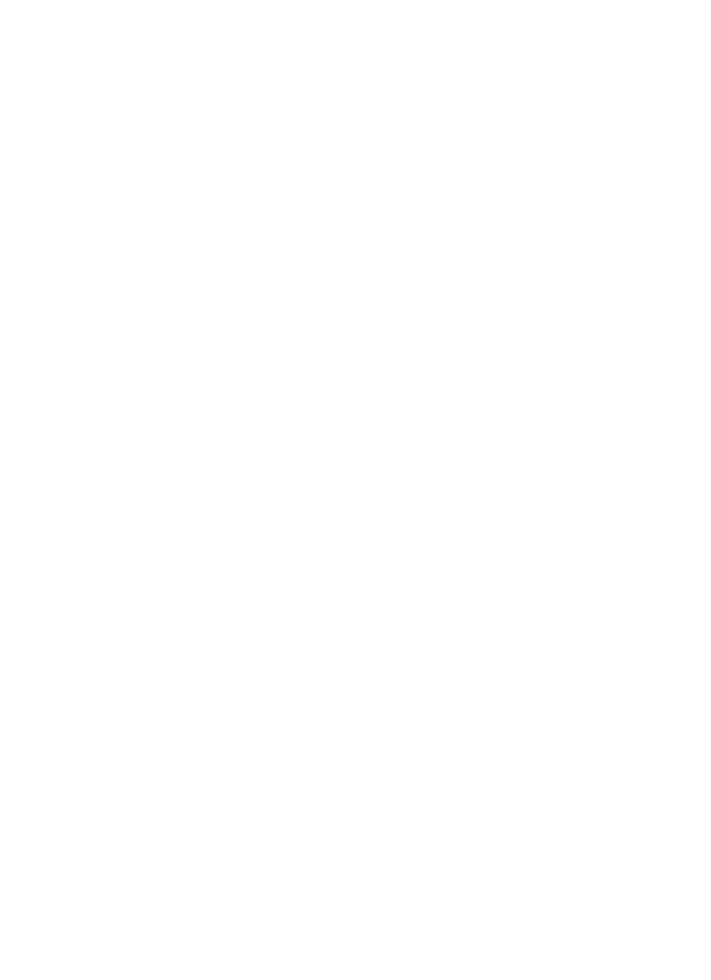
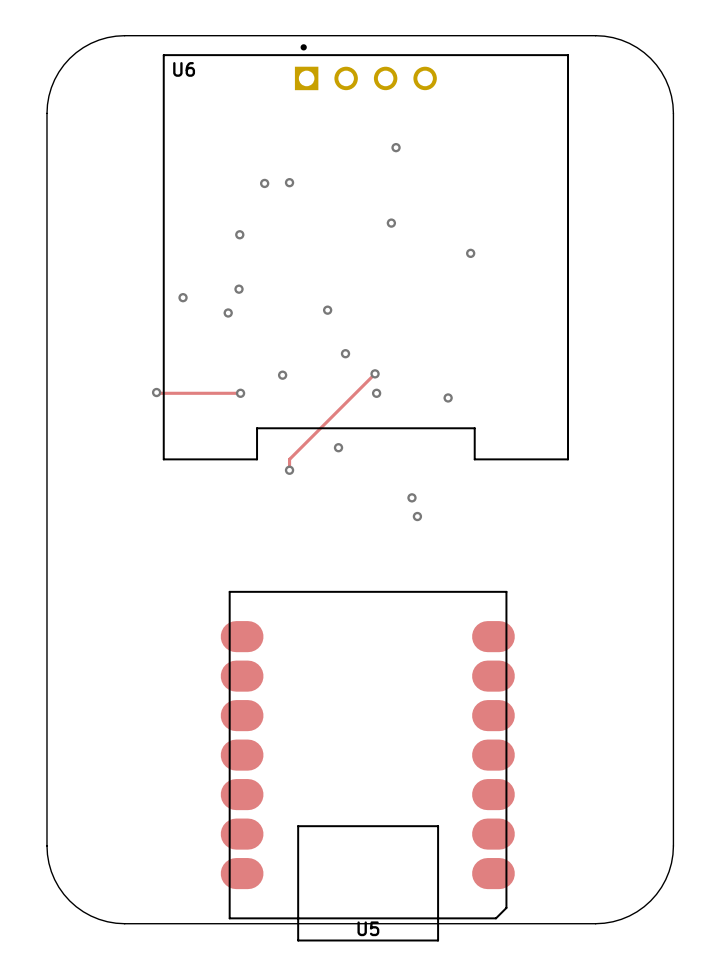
board edge: none -> (124, 35) (604, 36) (621, 40) (637, 47) (650, 58) (661, 72) (669, 87) (673, 113) (673, 845) (671, 863) (661, 887) (650, 900) (637, 911) (621, 919) (595, 923) (124, 923) (99, 919) (83, 911) (69, 900) (58, 887) (48, 863) (46, 845) (47, 104) (54, 79) (69, 58) (91, 43) (107, 37) (124, 35)
via: none -> (396, 147)
via: none -> (289, 182)
via: none -> (264, 183)
via: none -> (391, 223)
via: none -> (239, 234)
U6: none -> (365, 252)
via: none -> (470, 253)
via: none -> (239, 289)
via: none -> (183, 297)
via: none -> (327, 310)
via: none -> (228, 312)
via: none -> (345, 353)
track: none -> (375, 373) (289, 459) (289, 470)
via: none -> (375, 373)
via: none -> (282, 375)
track: none -> (156, 392) (240, 393)
via: none -> (156, 392)
via: none -> (240, 393)
via: none -> (376, 393)
via: none -> (448, 397)
via: none -> (338, 447)
via: none -> (289, 470)
via: none -> (411, 497)
via: none -> (417, 516)
U5: none -> (367, 766)

